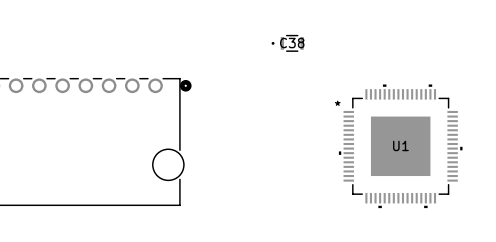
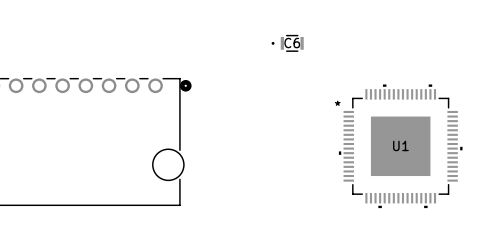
C38 name: C38 (292, 43) -> C6 (292, 43)

